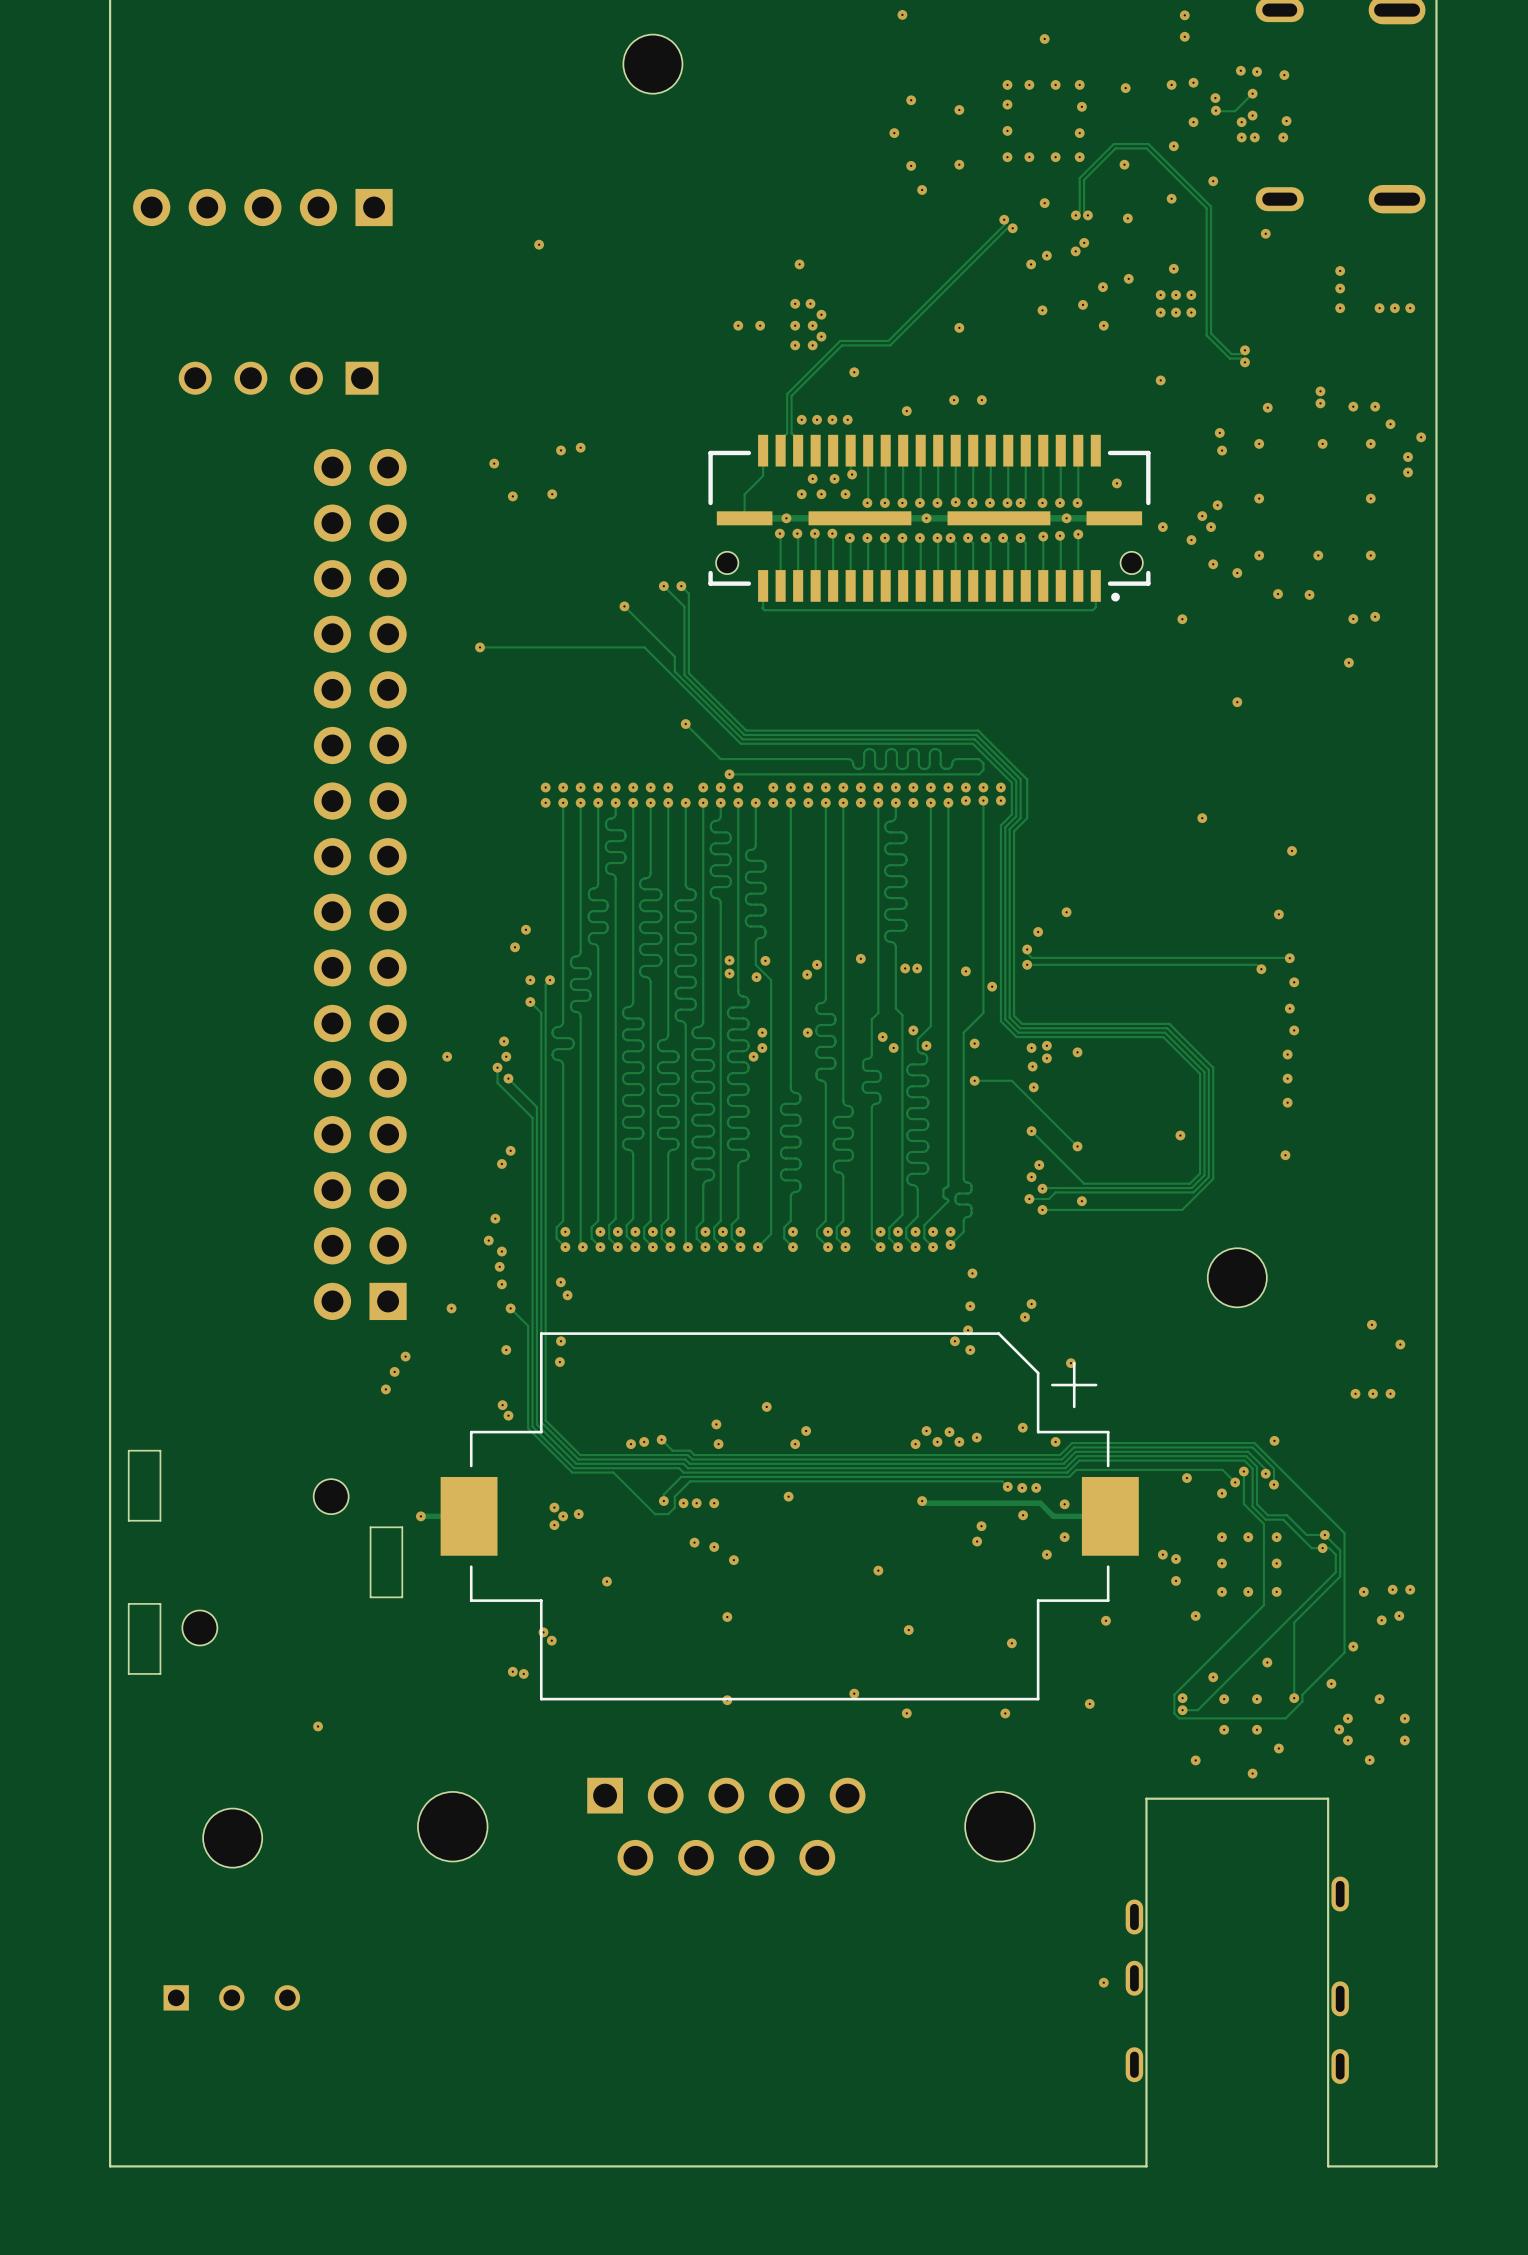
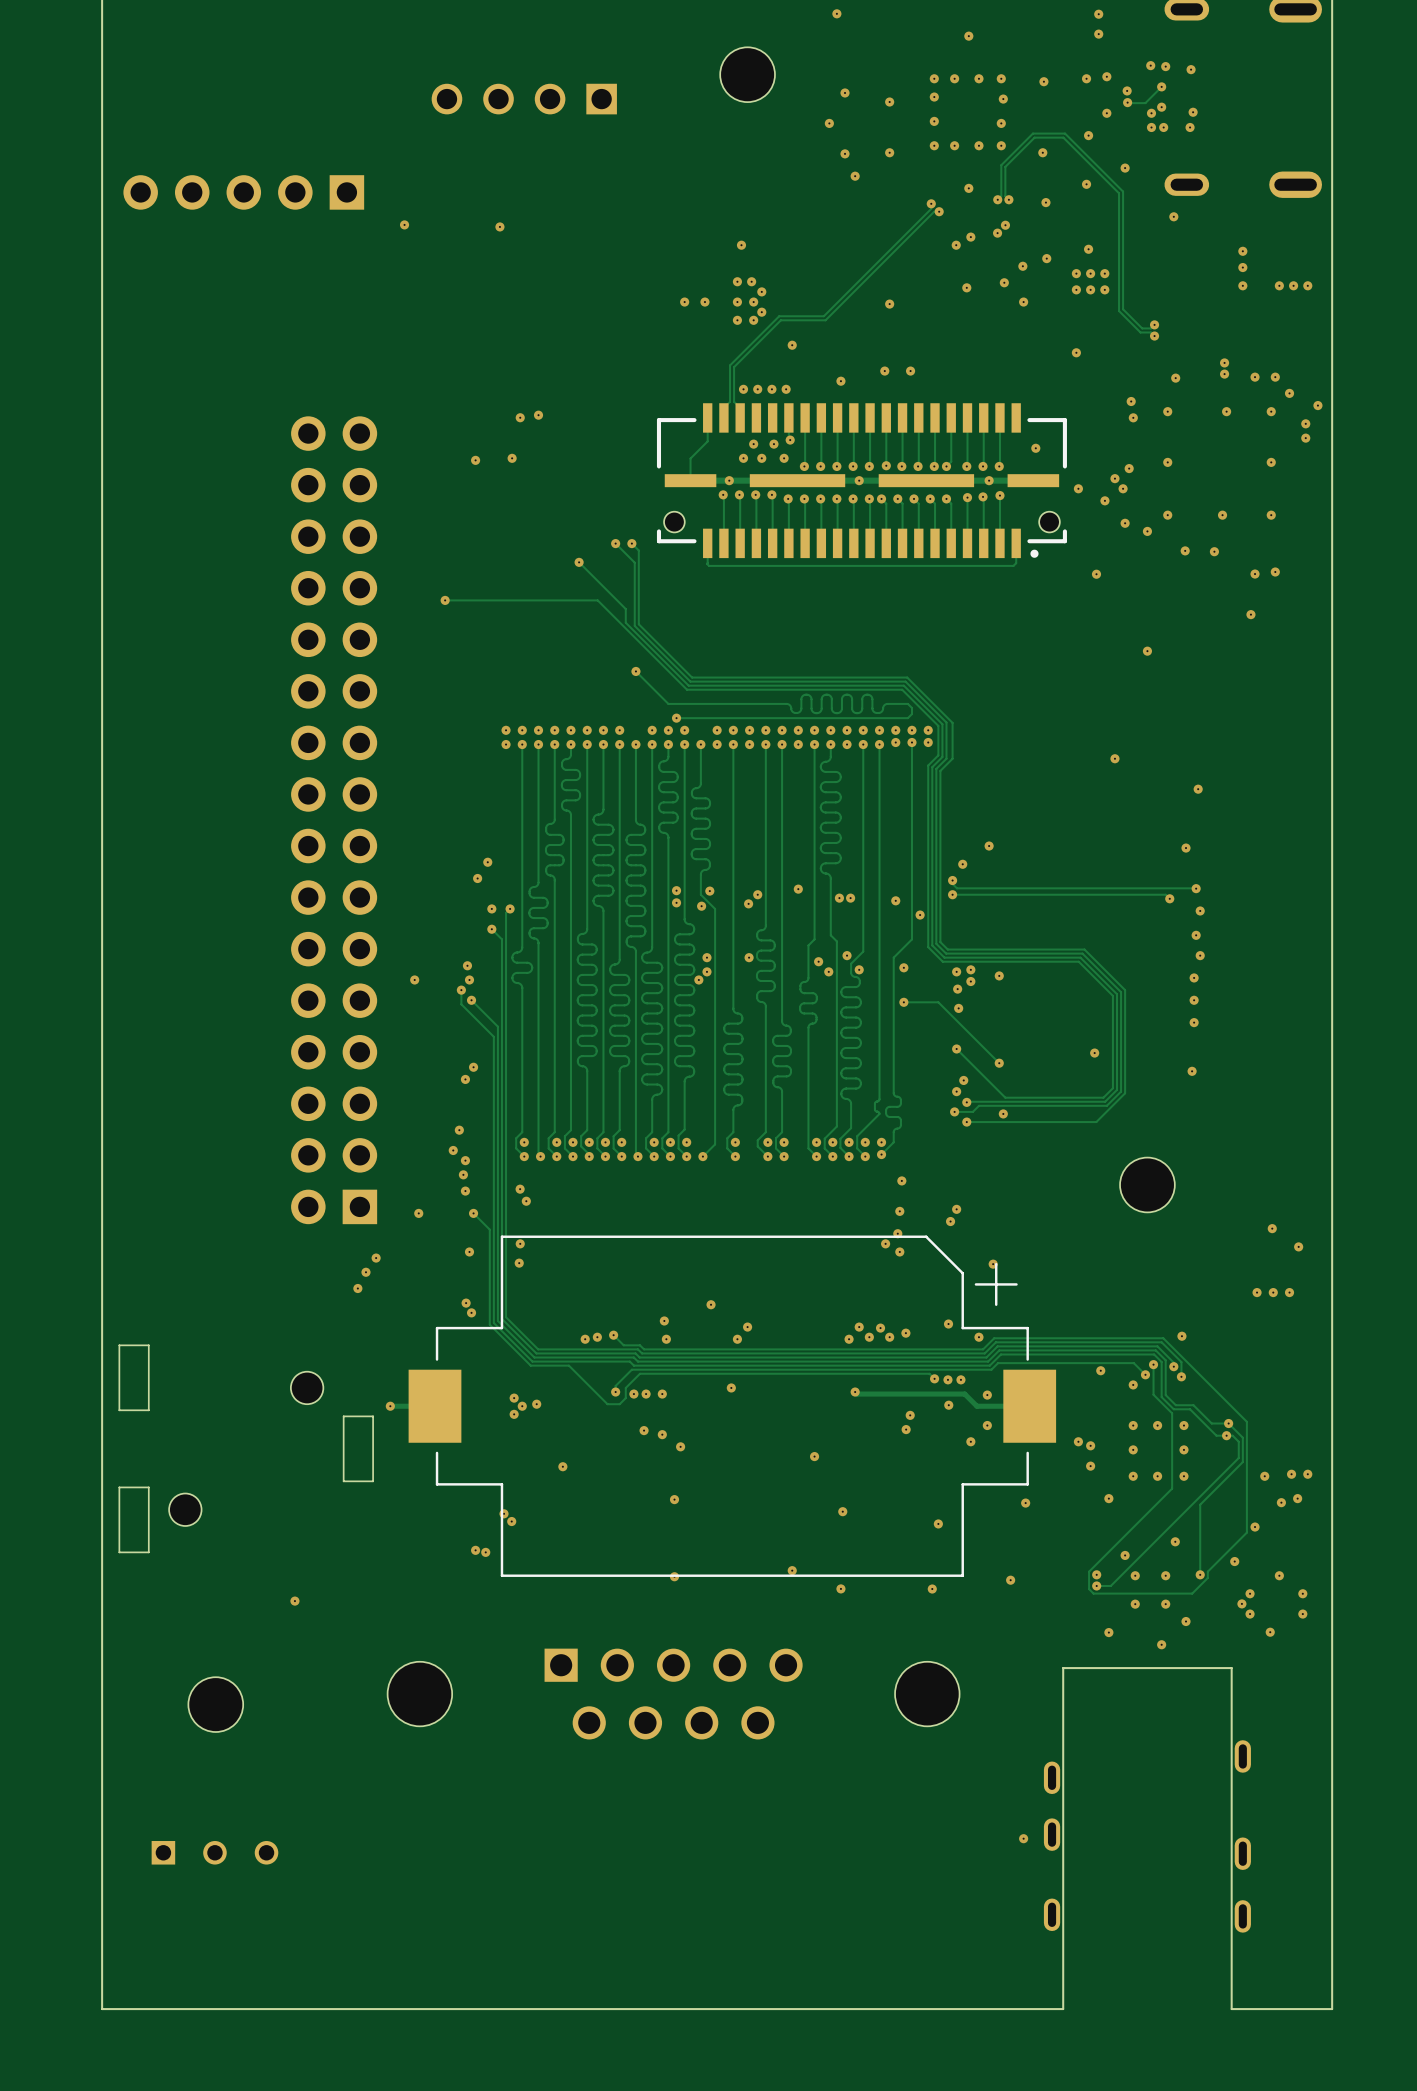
part position: (652, 64) -> (747, 74)
via: none -> (404, 224)
part position: (278, 378) -> (524, 99)
via: (494, 463) -> none

